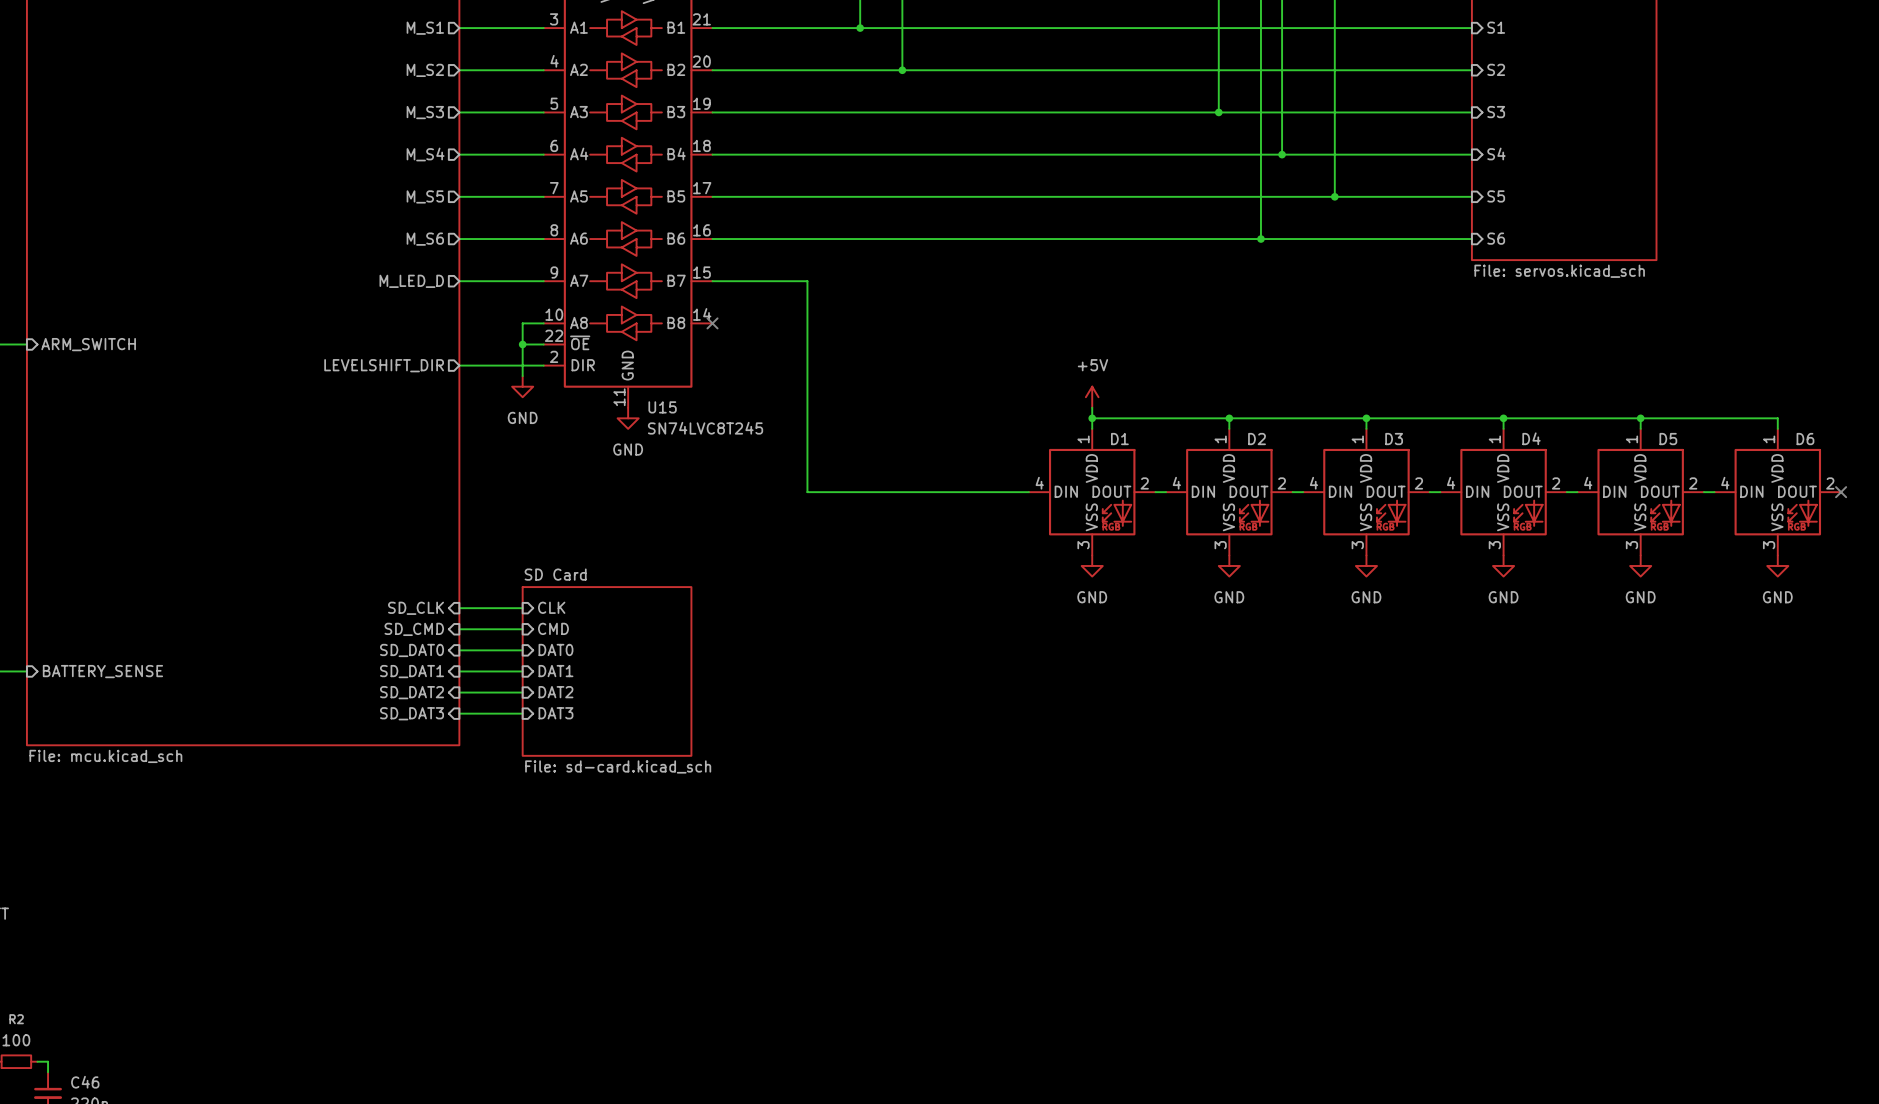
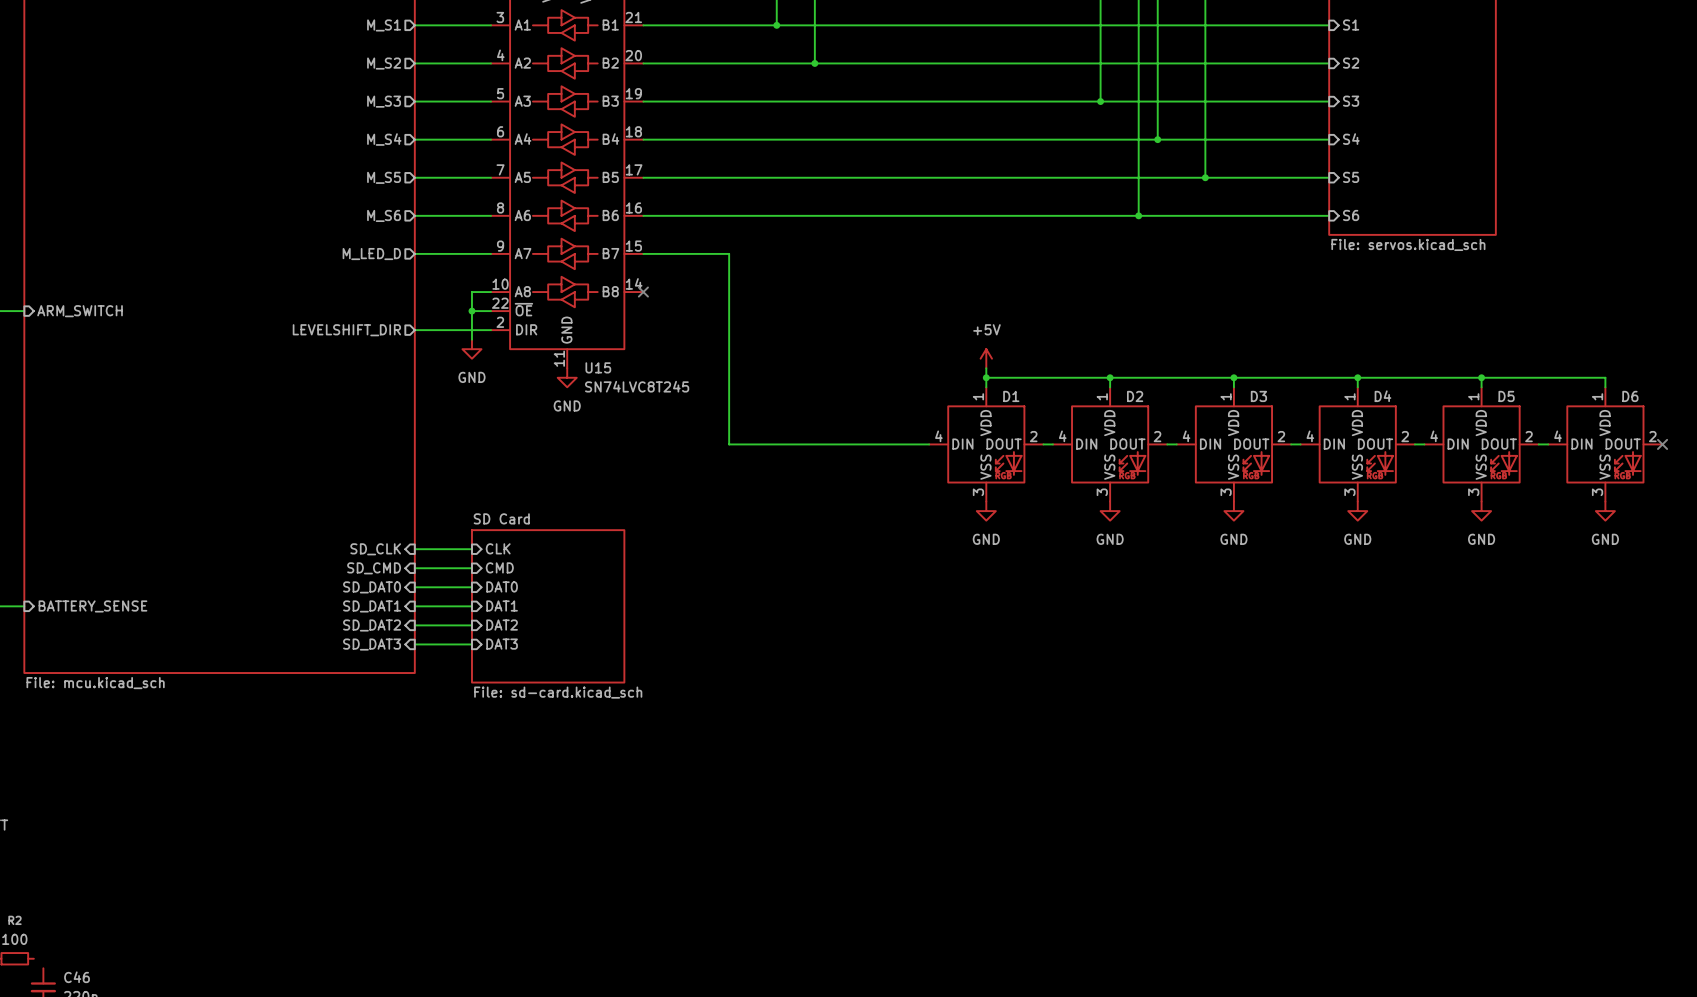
wire: (37, 1061) (48, 1061) (48, 1072) -> none

